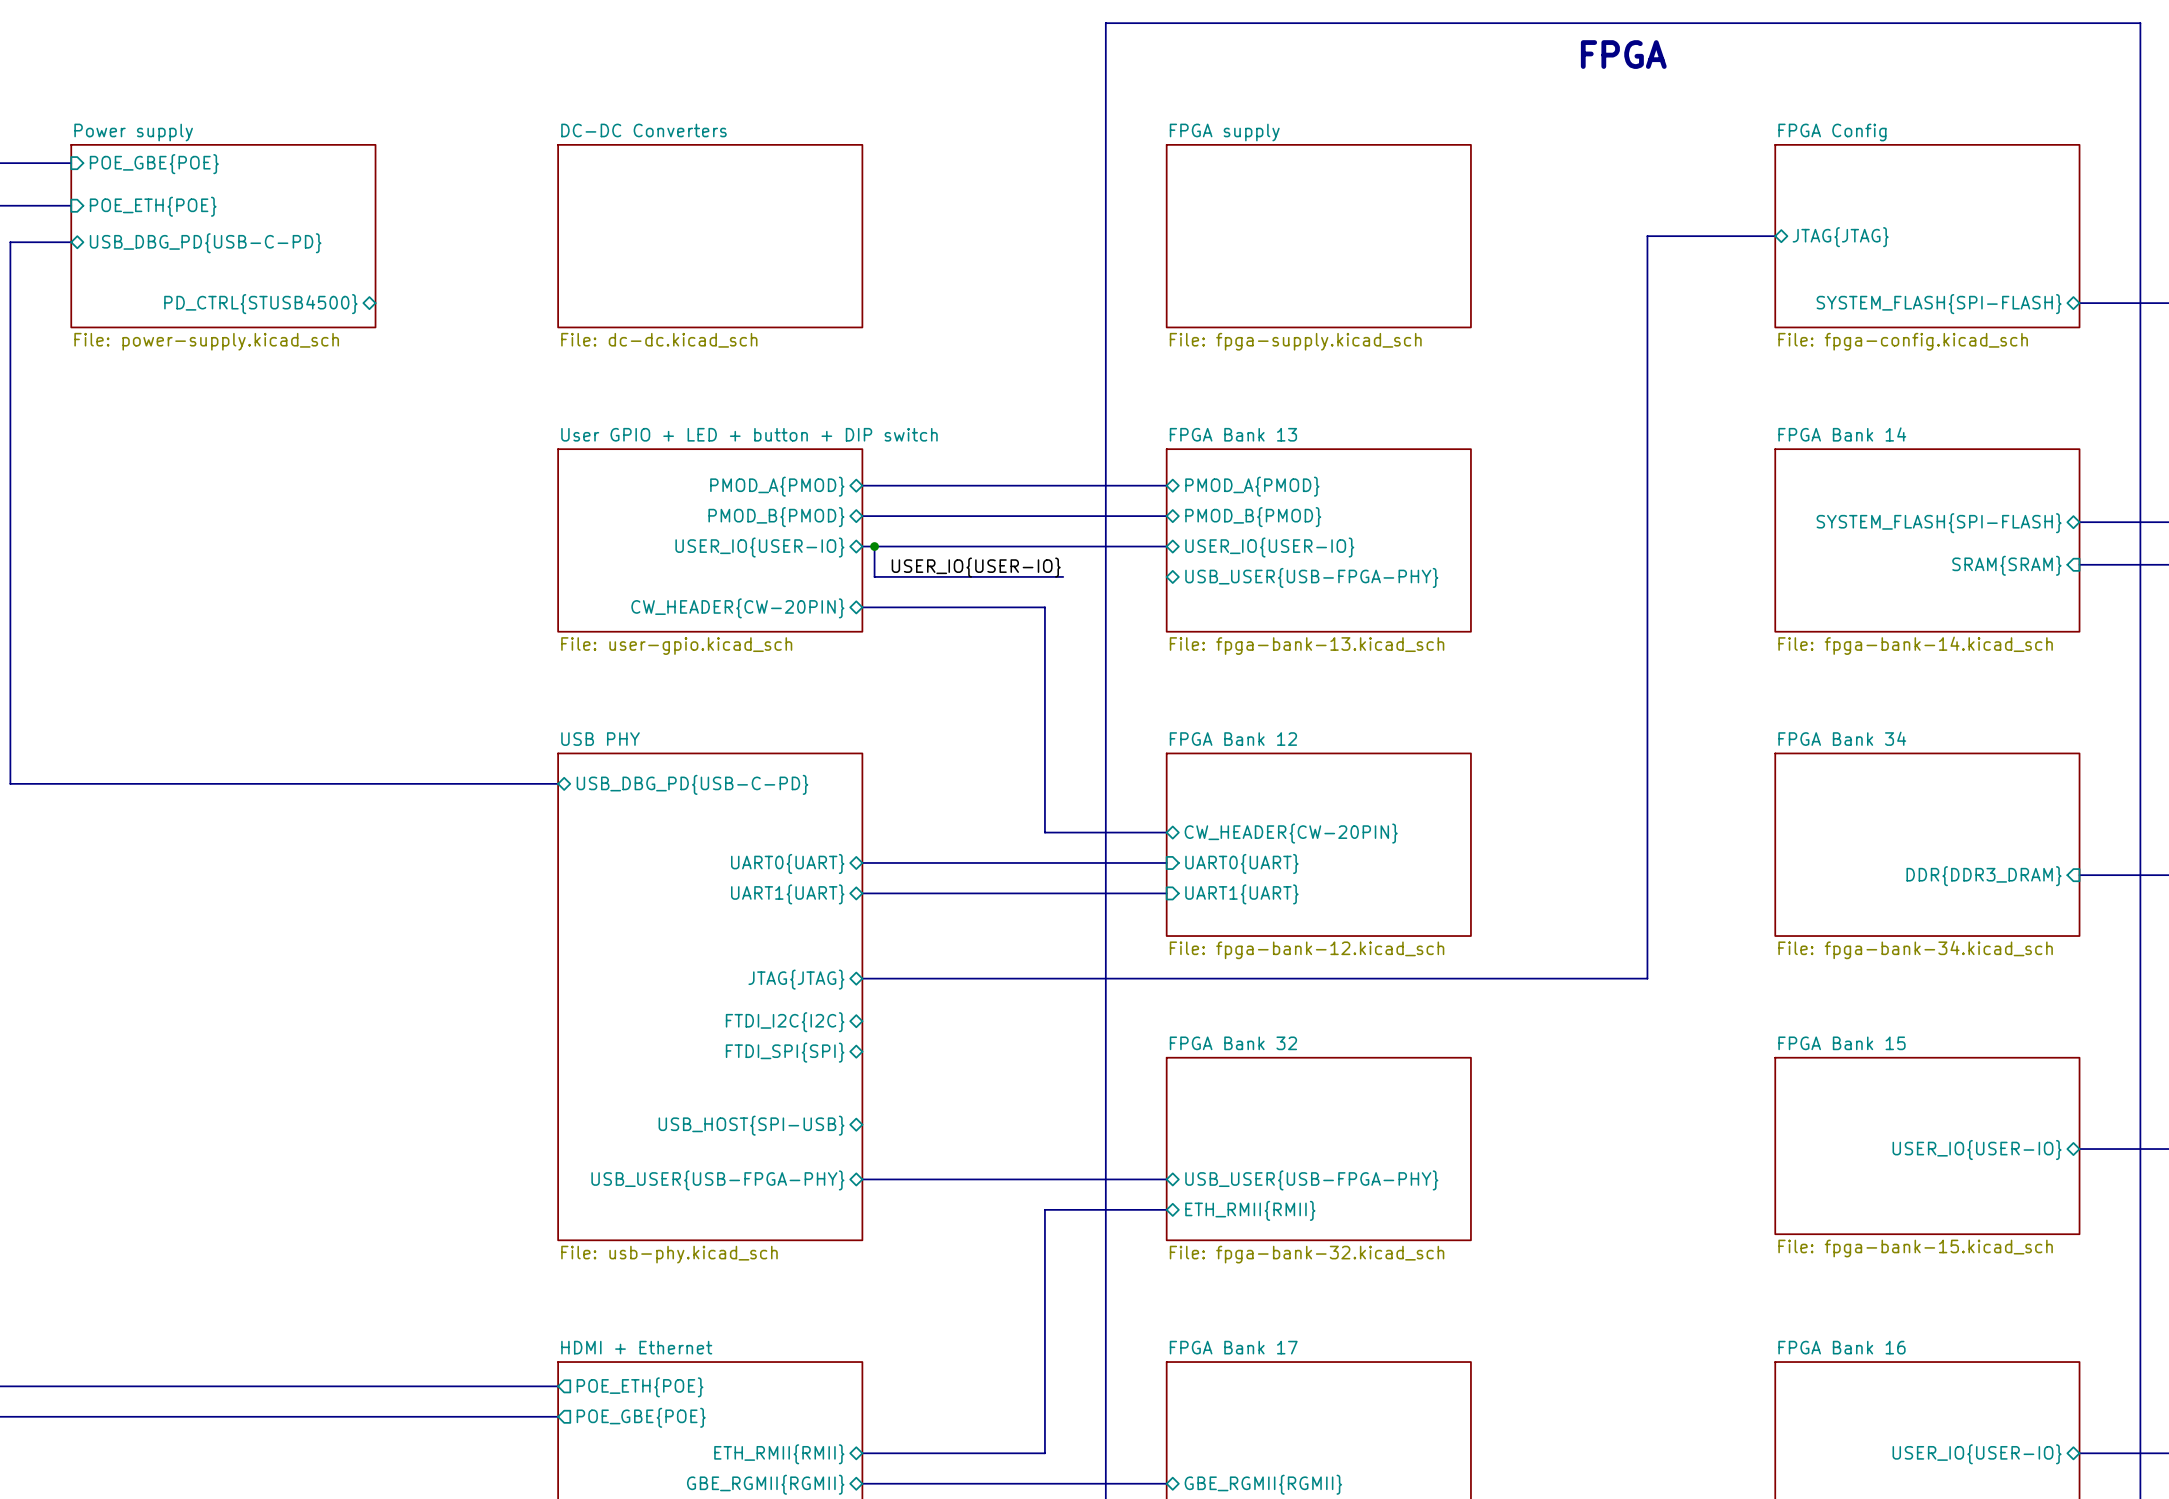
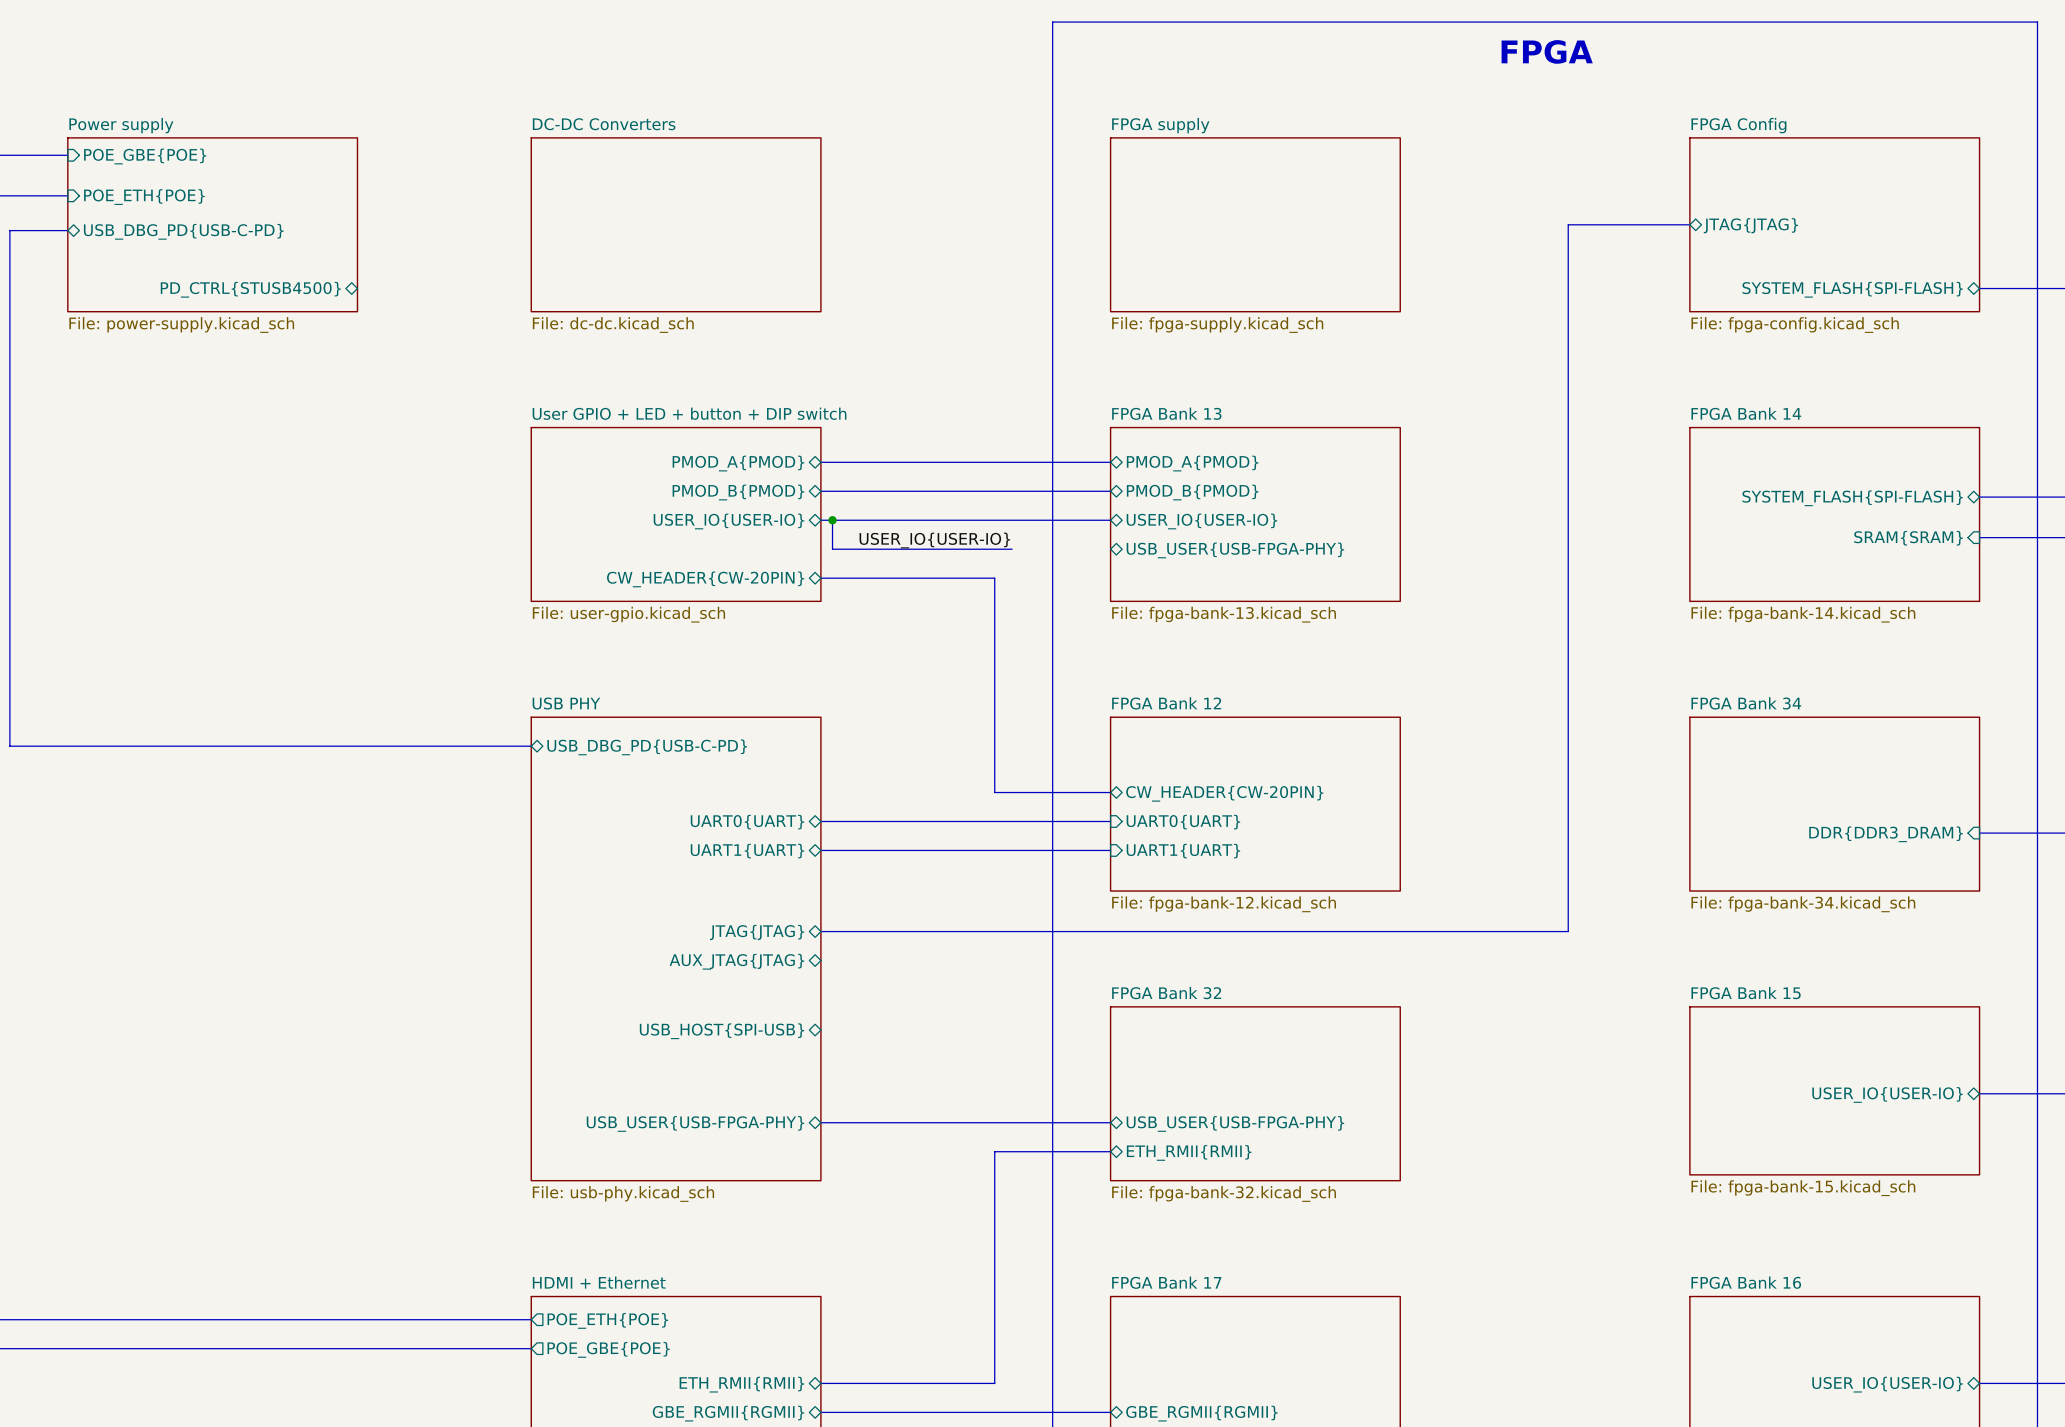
sheet pin: none -> AUX_JTAG{JTAG} (736, 961)
sheet pin: FTDI_I2C{I2C} (785, 1022) -> none
sheet pin: FTDI_SPI{SPI} (785, 1052) -> none
sheet pin position: USB_HOST{SPI-USB} (751, 1125) -> USB_HOST{SPI-USB} (722, 1031)

